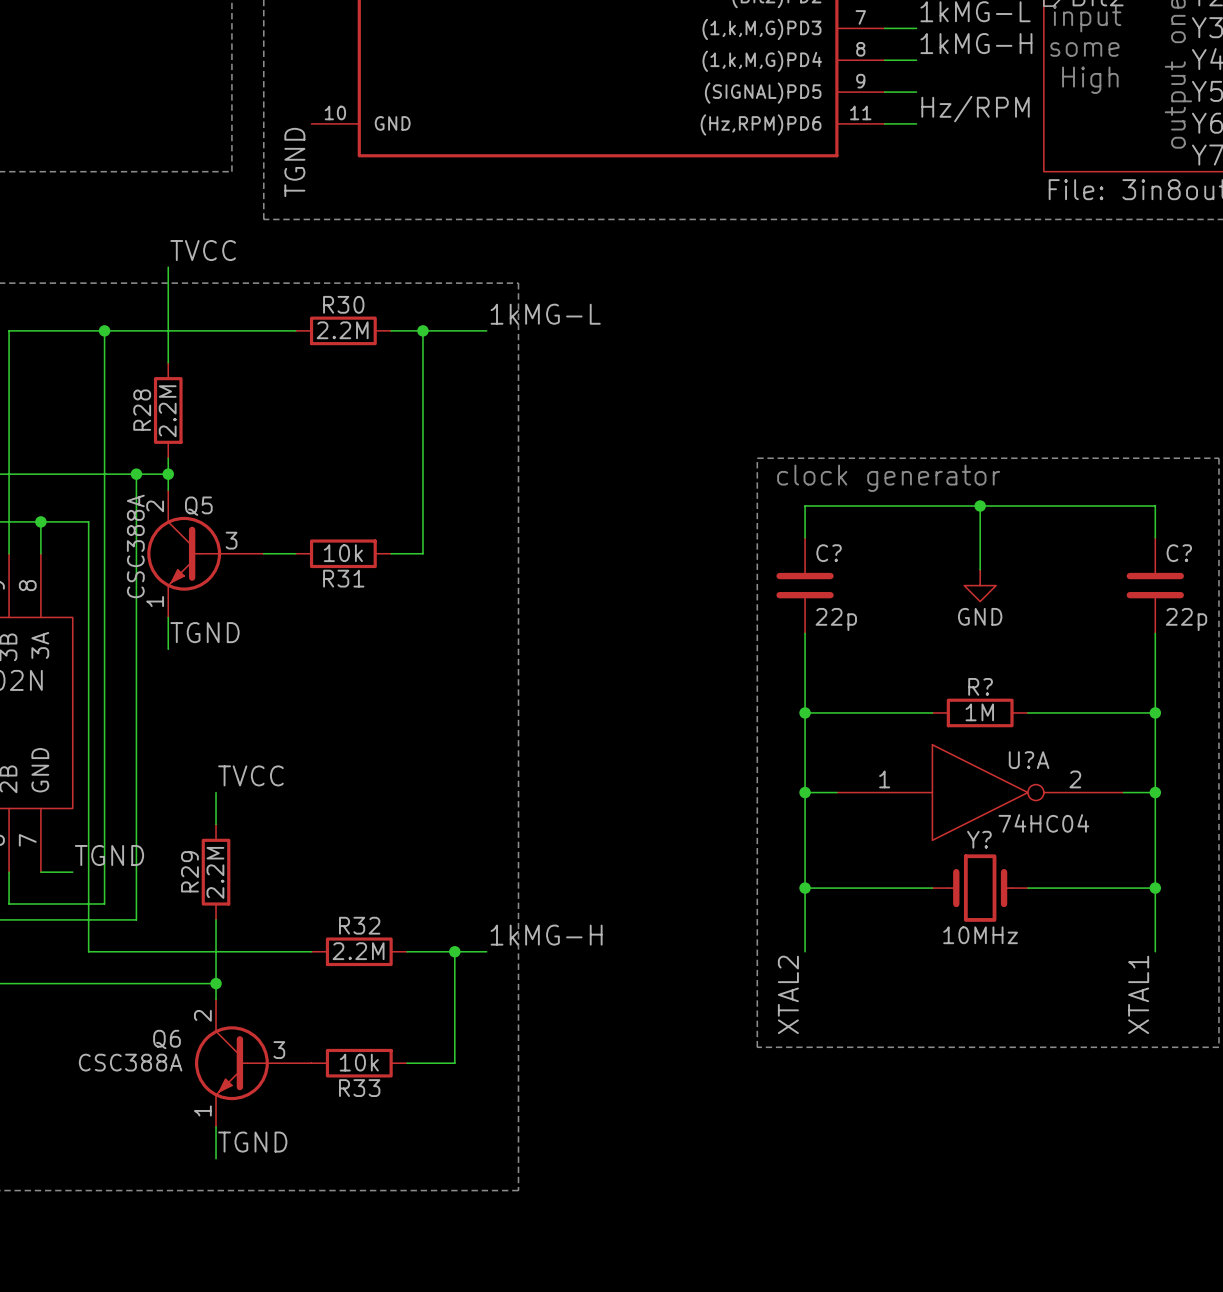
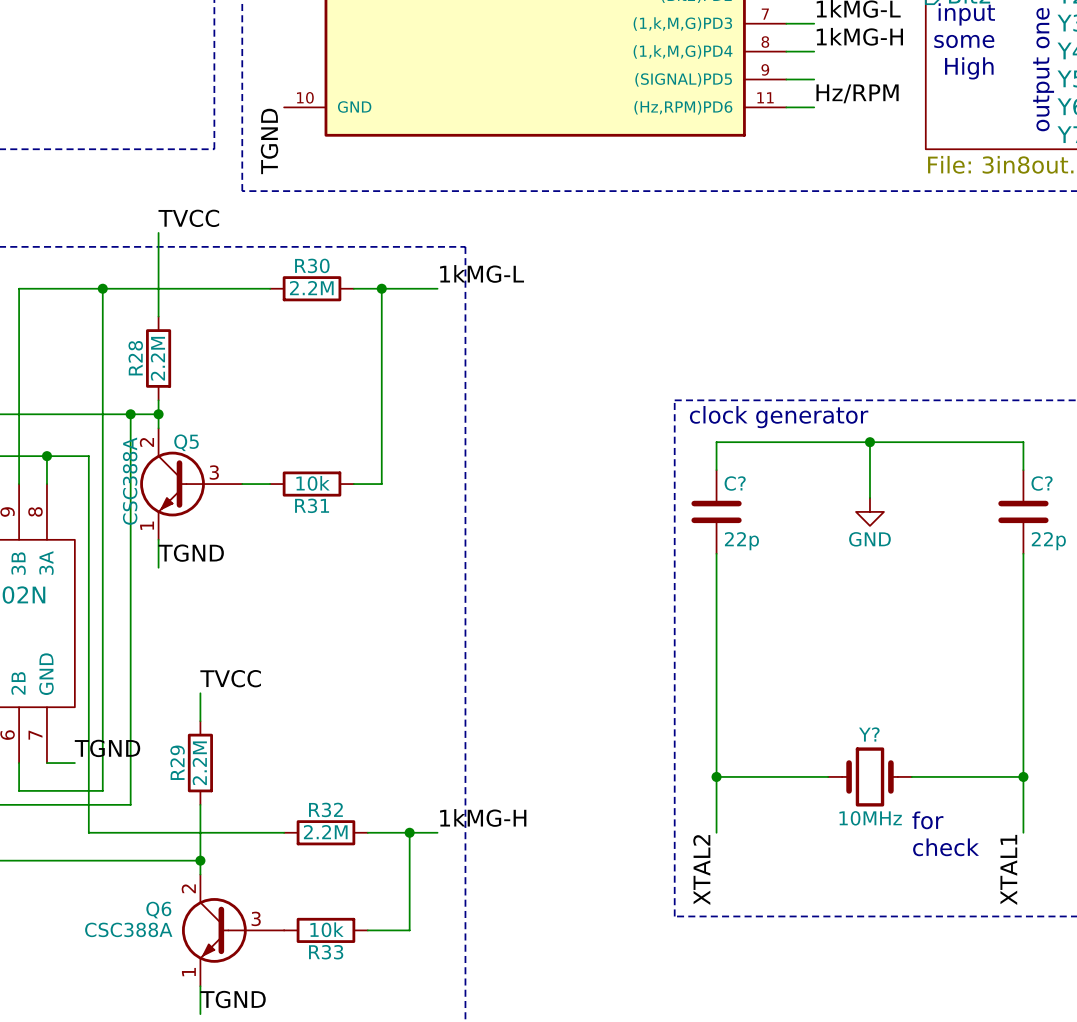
wire: (805, 712) (932, 712) -> none
junction: (805, 712) -> none
R?: 1M (980, 712) -> none
wire: (1027, 712) (1155, 712) -> none
junction: (1155, 712) -> none
wire: (805, 792) (836, 792) -> none
junction: (805, 792) -> none
U?A: 74HC04 (980, 792) -> none
wire: (1123, 792) (1155, 792) -> none
junction: (1155, 792) -> none
text: none -> for (927, 820)
text: none -> check (946, 847)

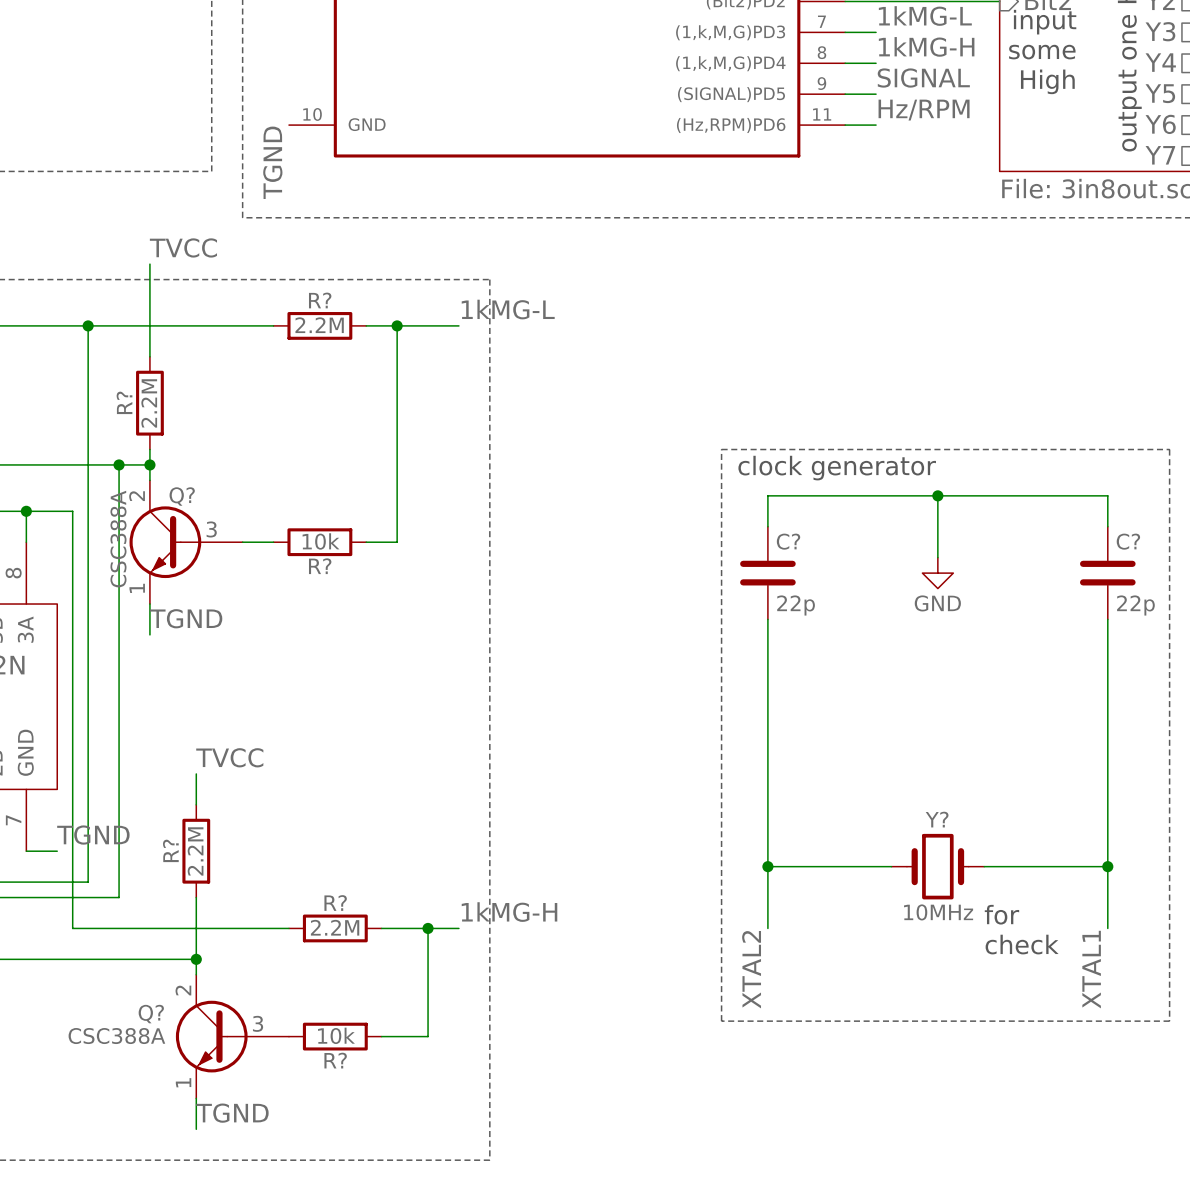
label: none -> SIGNAL (923, 78)
R30 name: R30 (312, 265) -> R? (320, 300)
R28 name: R28 (135, 358) -> R? (124, 402)
Q5 name: Q5 (186, 442) -> Q? (182, 496)
R31 name: R31 (312, 505) -> R? (320, 566)
R29 name: R29 (177, 762) -> R? (170, 850)
R32 name: R32 (325, 809) -> R? (335, 903)
Q6 name: Q6 (158, 910) -> Q? (151, 1014)
R33 name: R33 (326, 952) -> R? (335, 1060)

